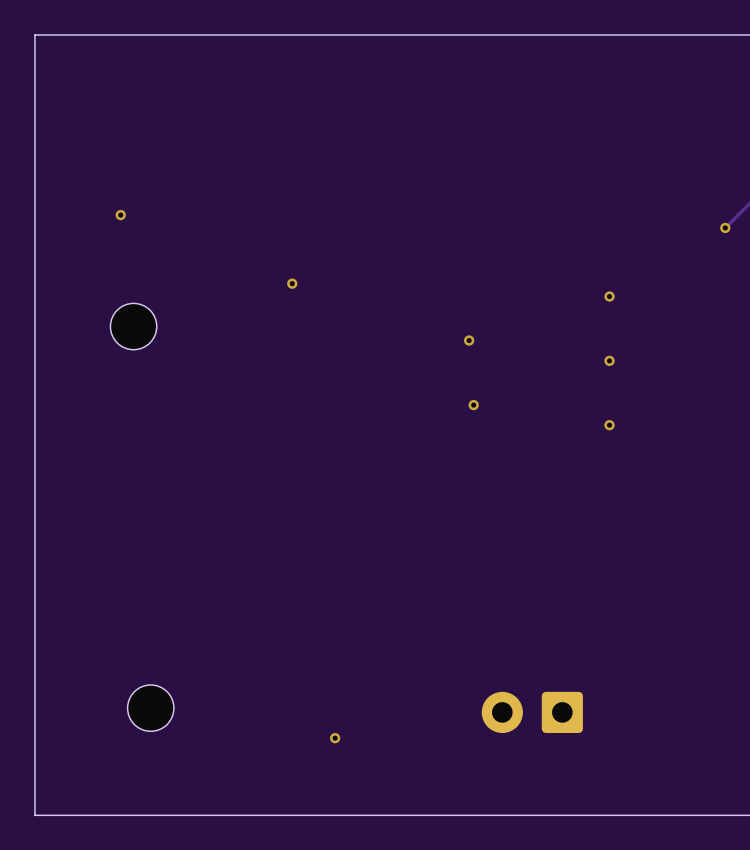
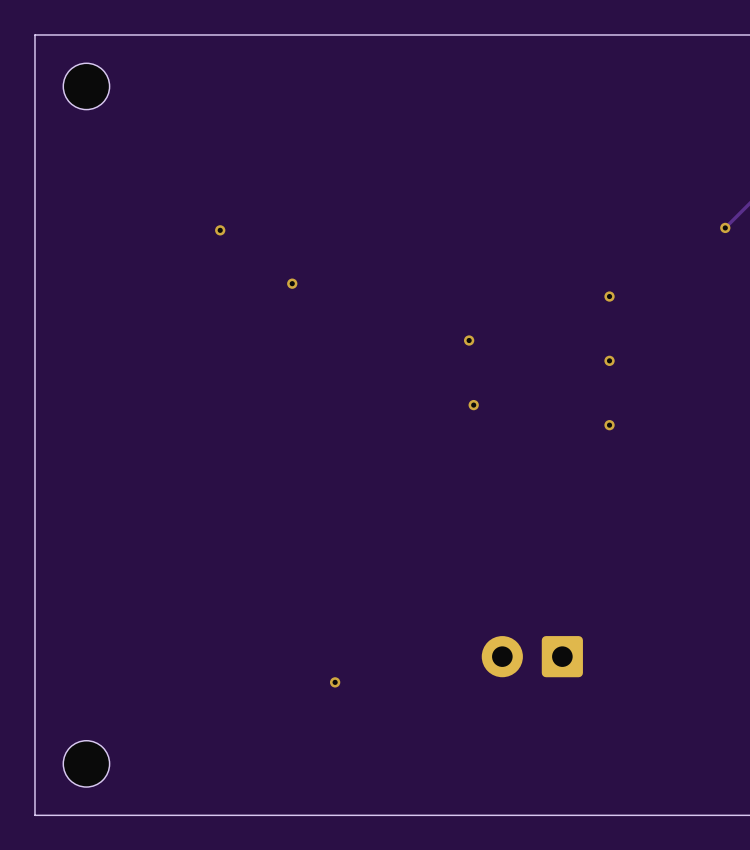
part: none -> (86, 86)
via position: (120, 215) -> (220, 230)
part: (133, 326) -> none
part position: (150, 708) -> (86, 763)
part position: (532, 712) -> (532, 656)
via position: (335, 738) -> (335, 682)

